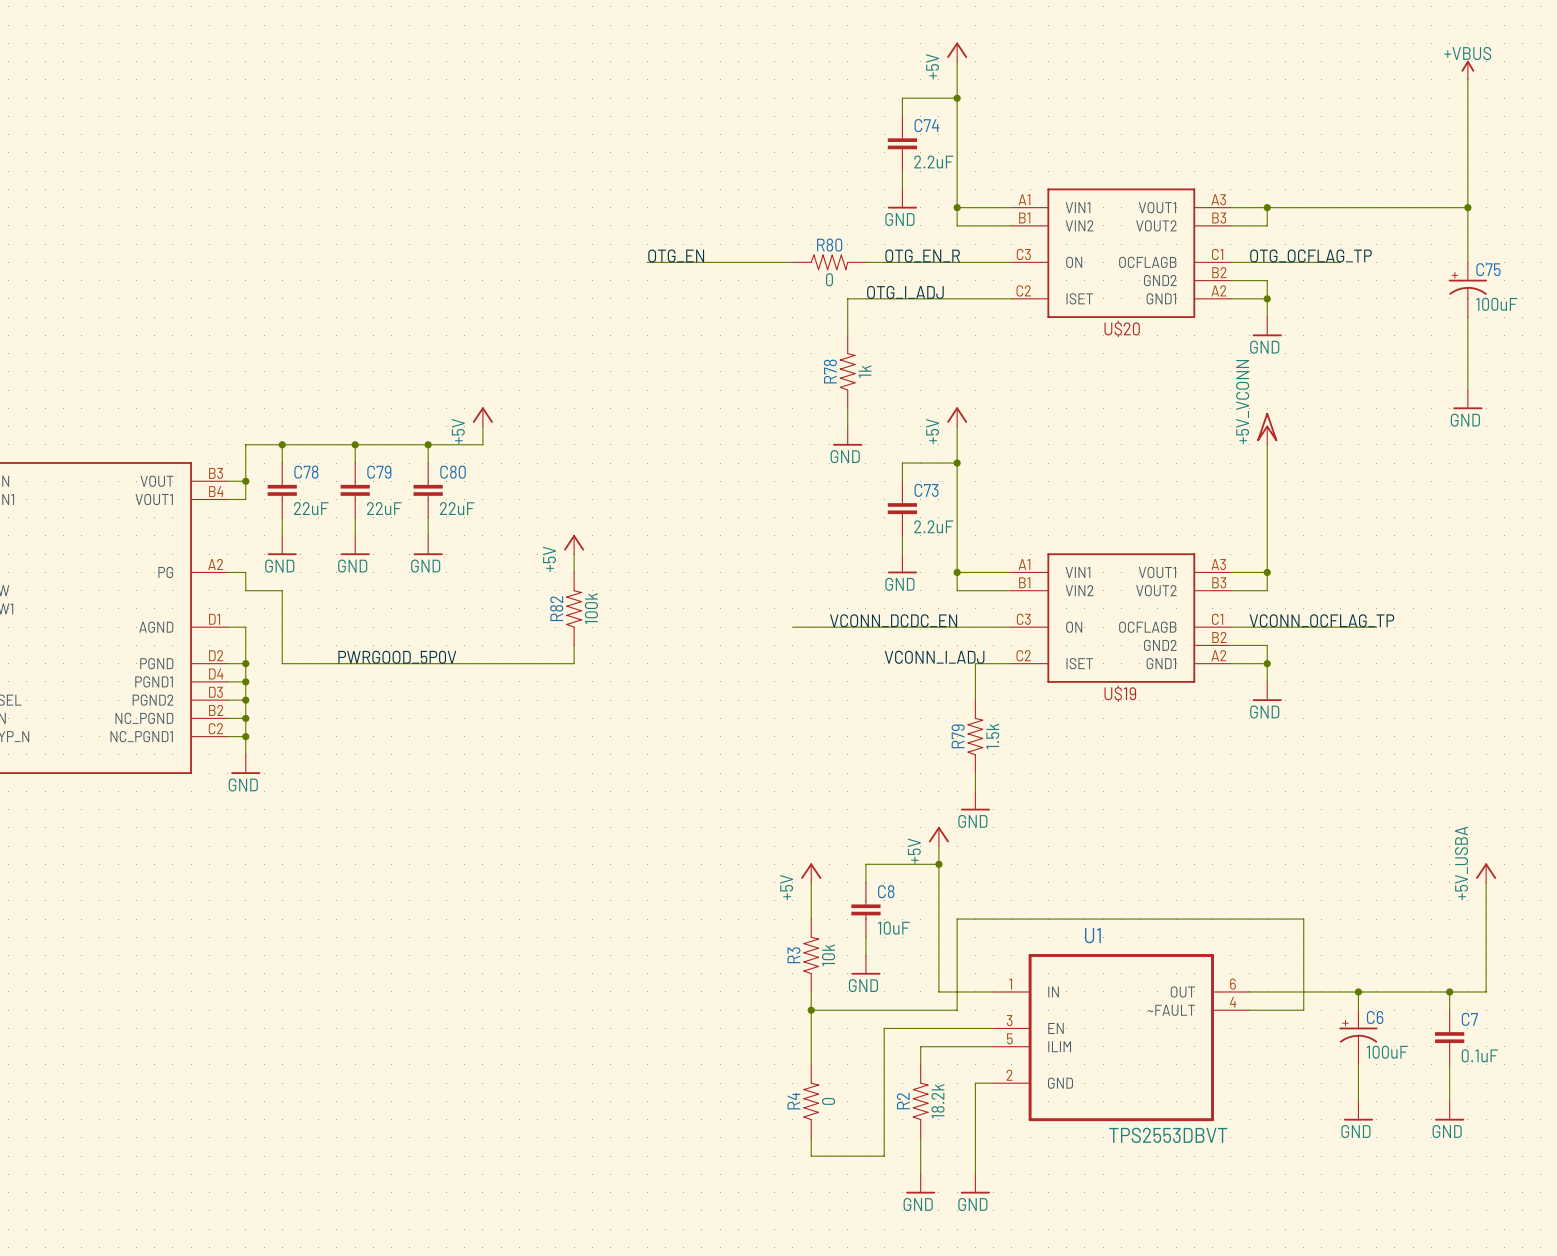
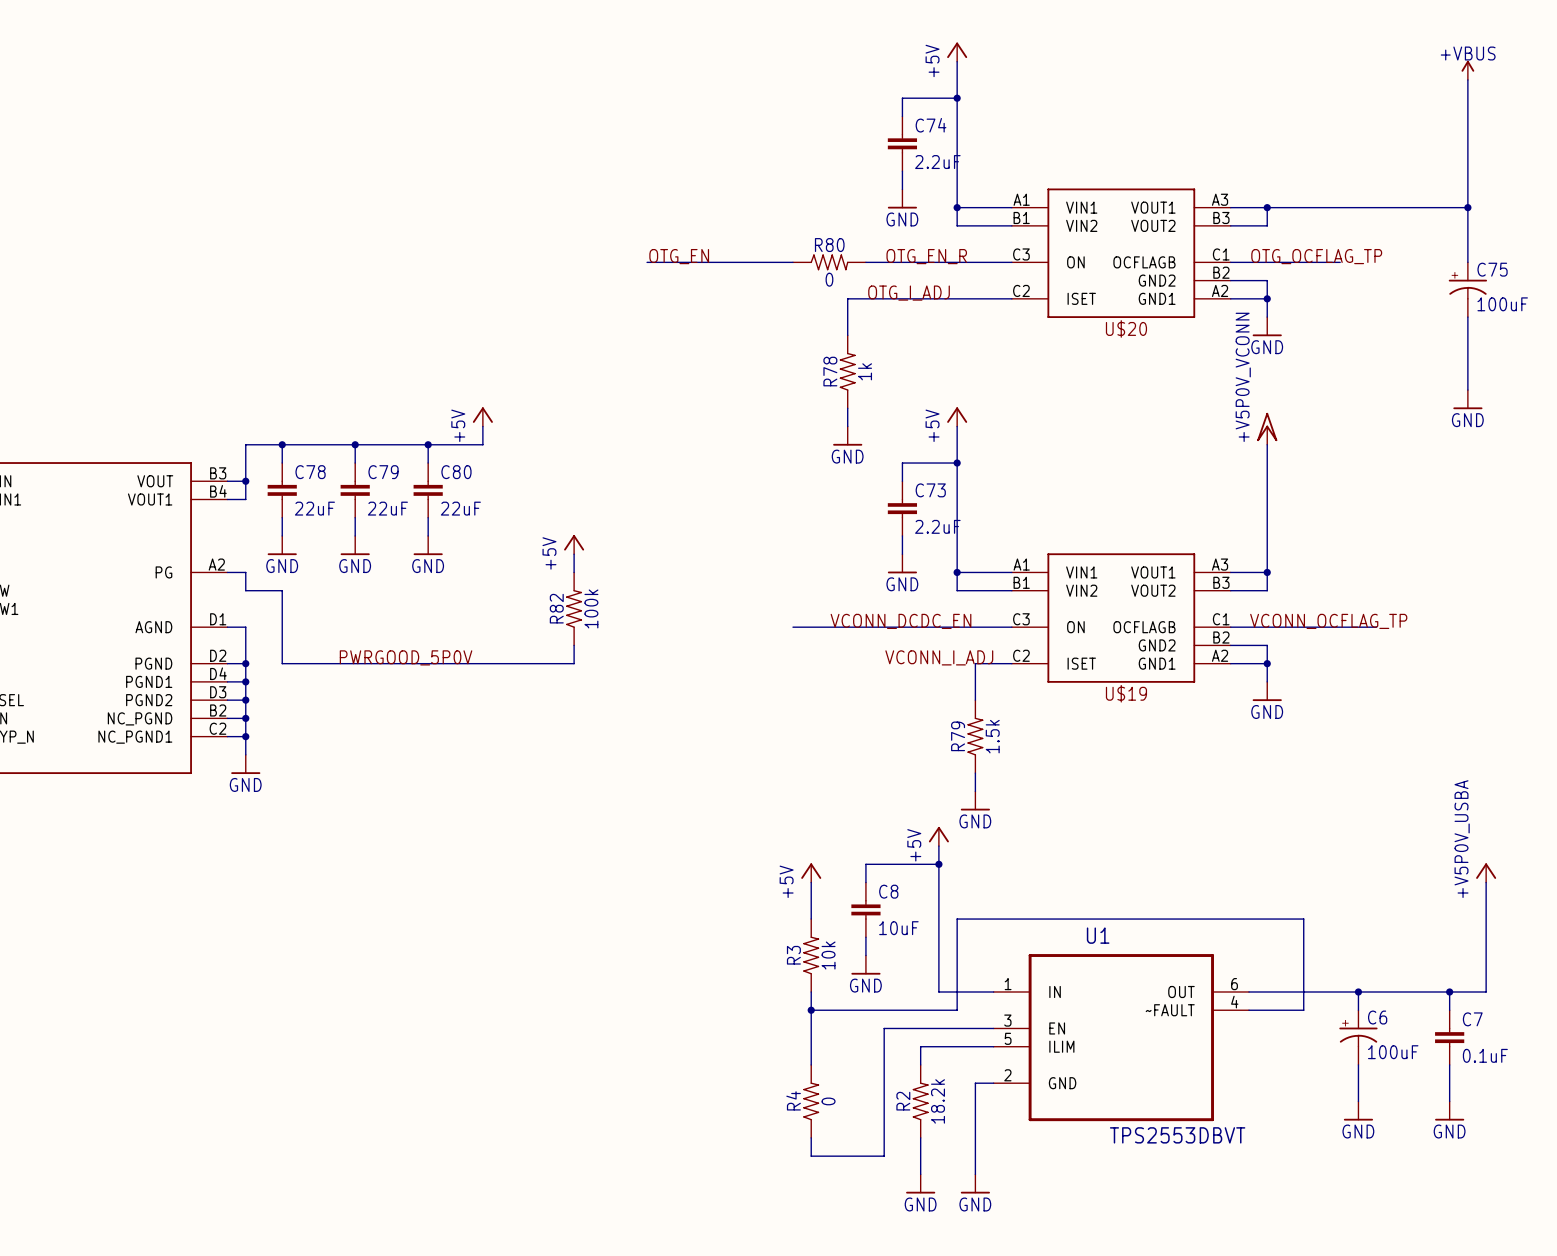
power symbol: +5V_VCONN (1267, 428) -> +V5P0V_VCONN (1267, 428)
power symbol: +5V_USBA (1486, 872) -> +V5P0V_USBA (1486, 872)

